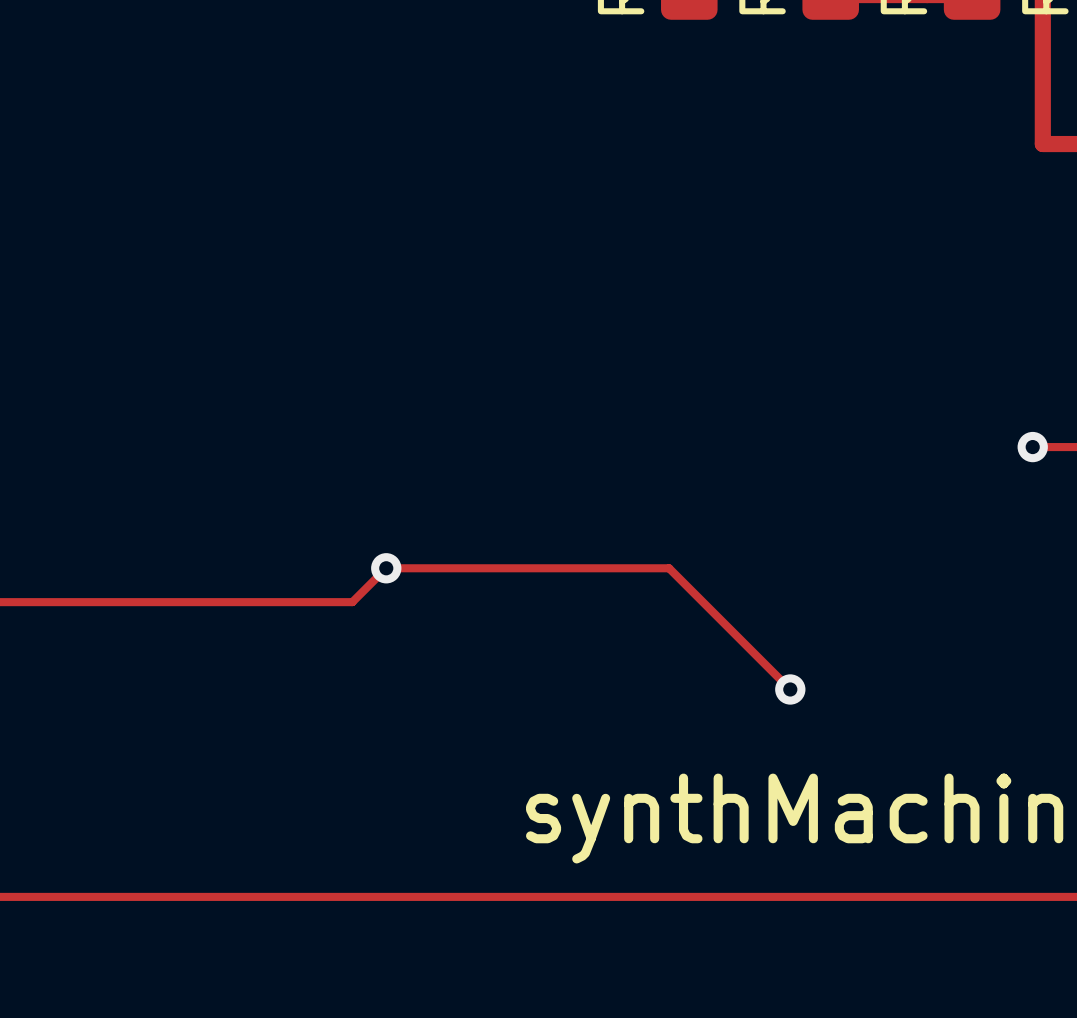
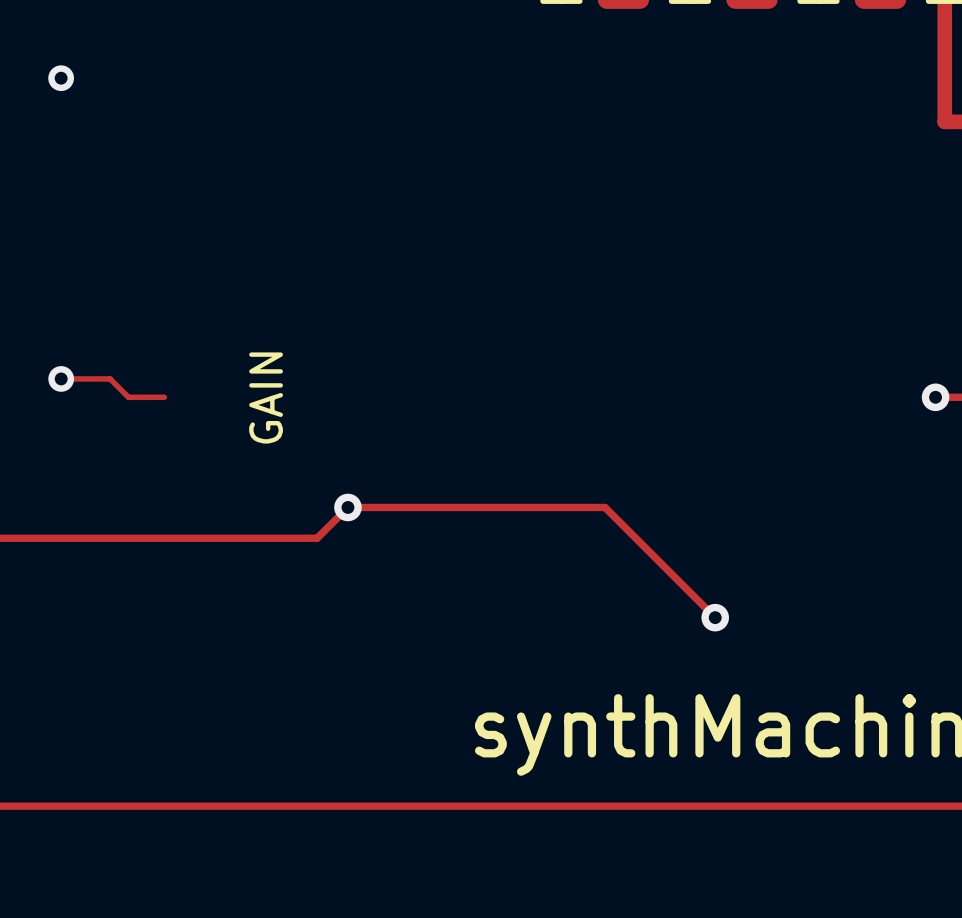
via: none -> (61, 78)
track: none -> (61, 378) (110, 378) (128, 397) (164, 397)
via: none -> (61, 378)
text: none -> GAIN (266, 397)

